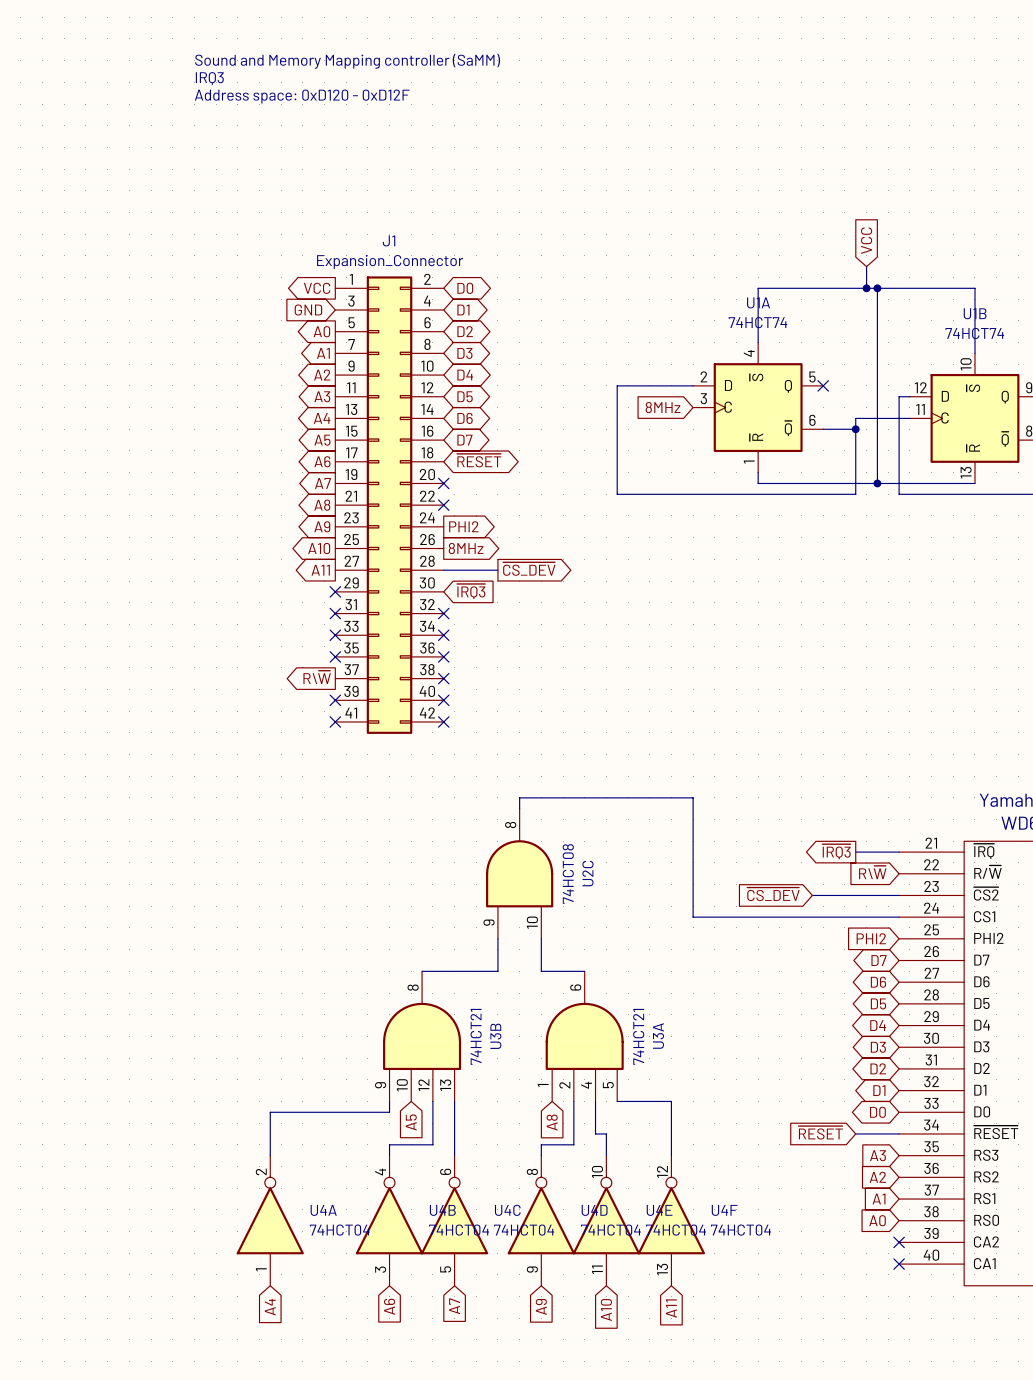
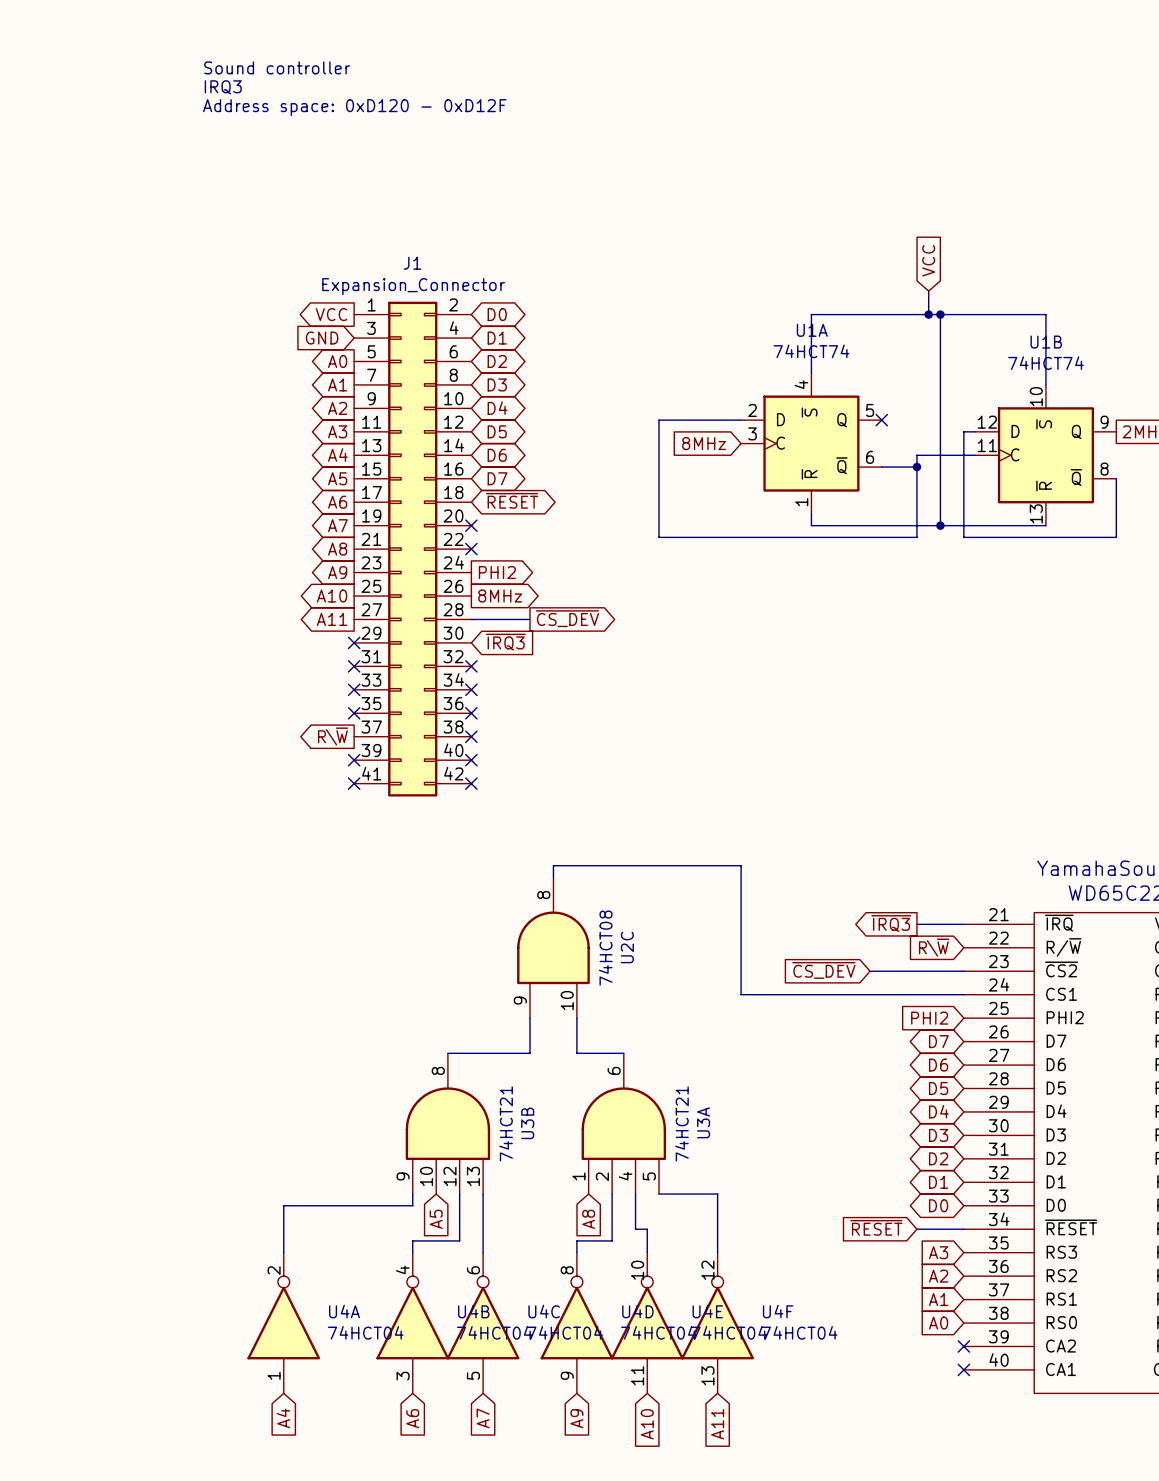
text: Sound and Memory Mapping controller (SaMM) (347, 61) -> Sound controller (277, 67)

